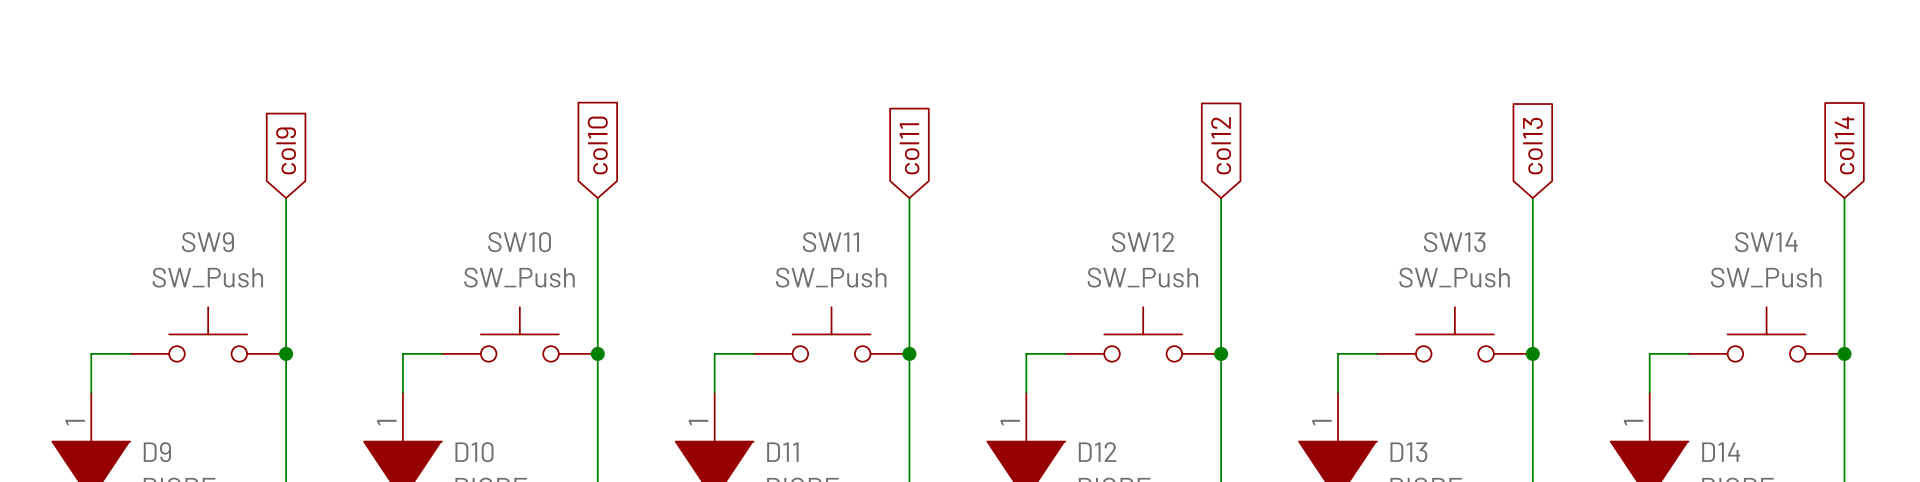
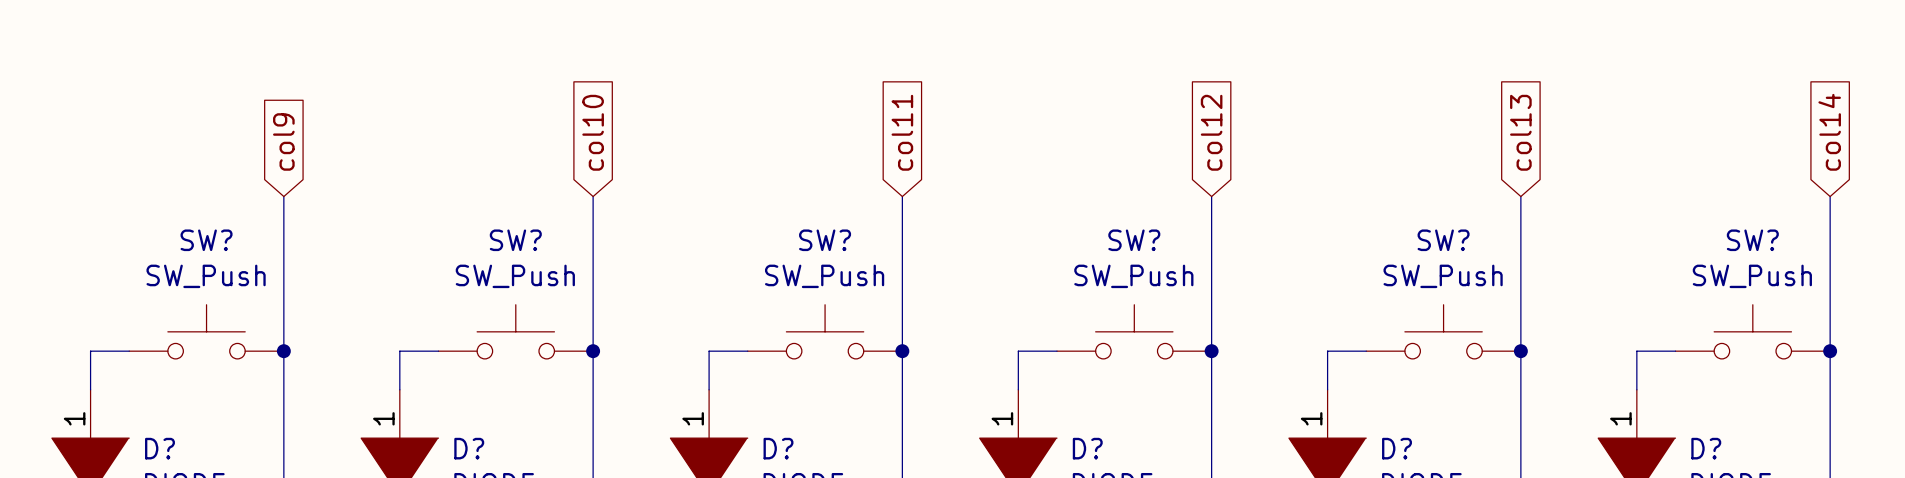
SW9 name: SW9 (207, 242) -> SW? (206, 240)
SW10 name: SW10 (519, 242) -> SW? (515, 240)
SW11 name: SW11 (830, 242) -> SW? (825, 240)
SW12 name: SW12 (1143, 242) -> SW? (1134, 240)
SW13 name: SW13 (1454, 242) -> SW? (1443, 240)
SW14 name: SW14 (1766, 242) -> SW? (1752, 240)
D9 name: D9 (157, 452) -> D? (159, 448)
D10 name: D10 (474, 452) -> D? (469, 448)
D11 name: D11 (782, 452) -> D? (778, 448)
D12 name: D12 (1097, 452) -> D? (1087, 448)
D13 name: D13 (1408, 452) -> D? (1397, 448)
D14 name: D14 (1721, 452) -> D? (1706, 448)

